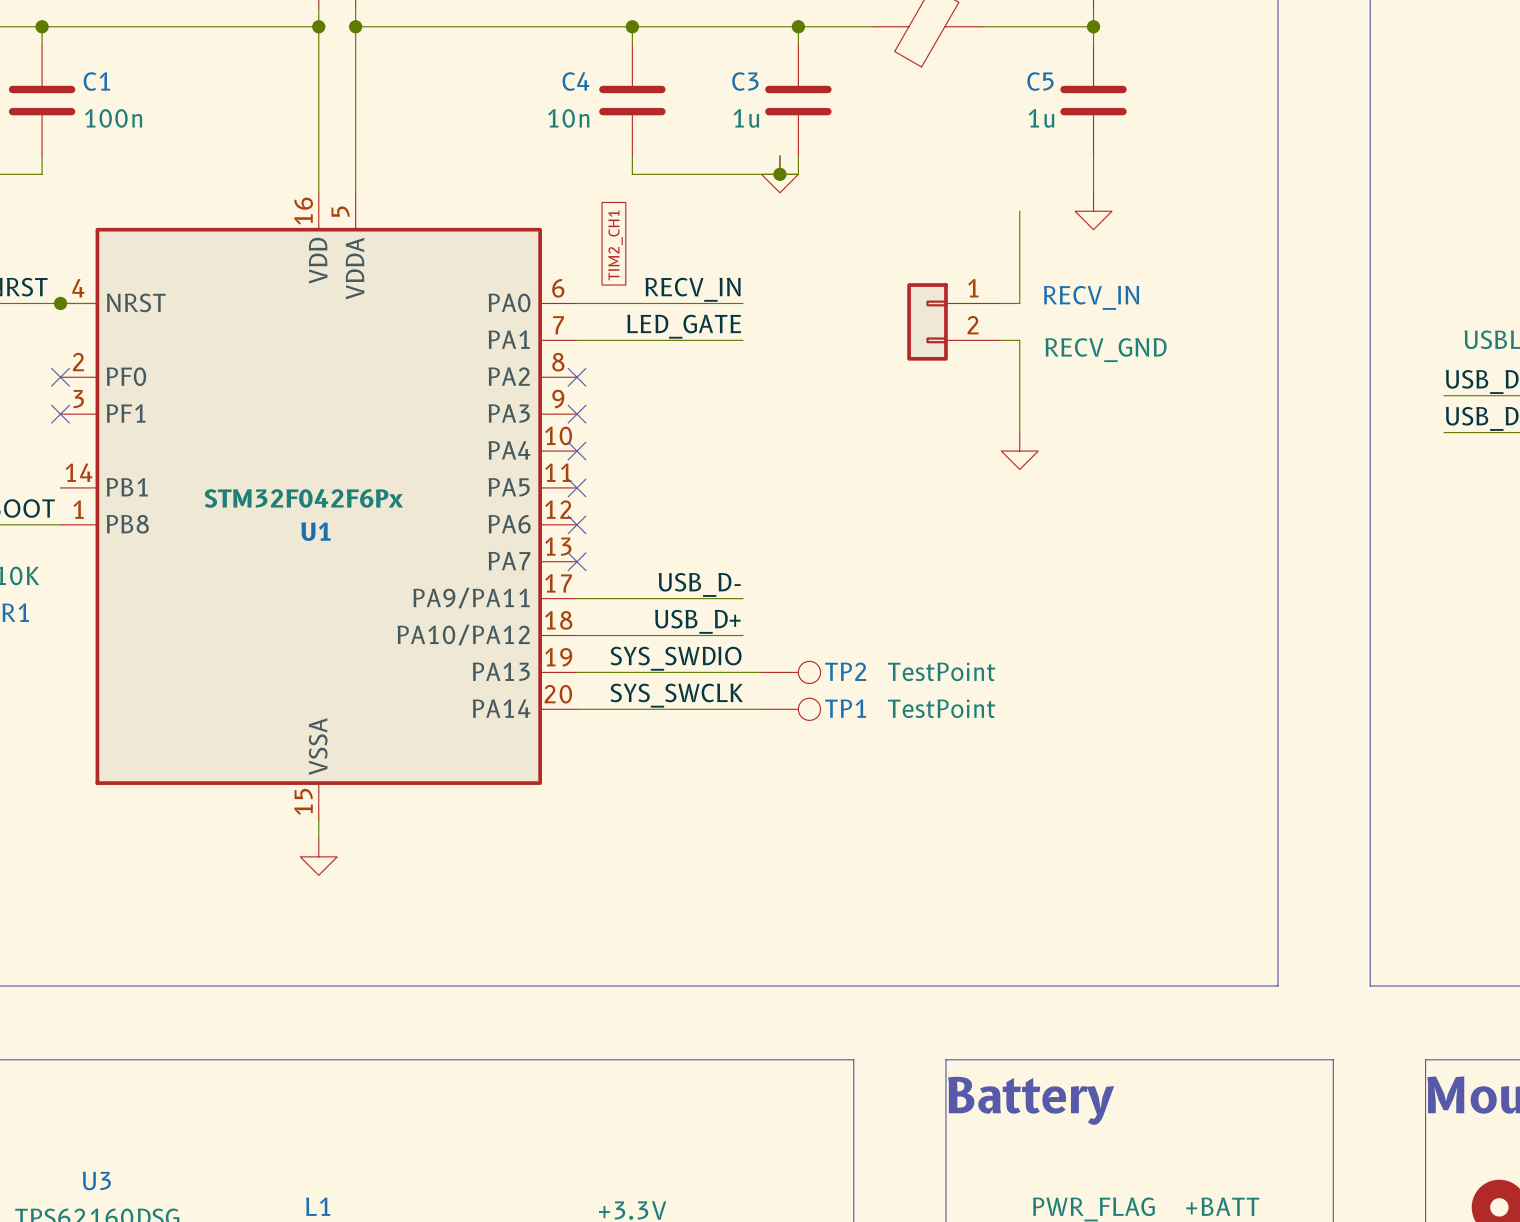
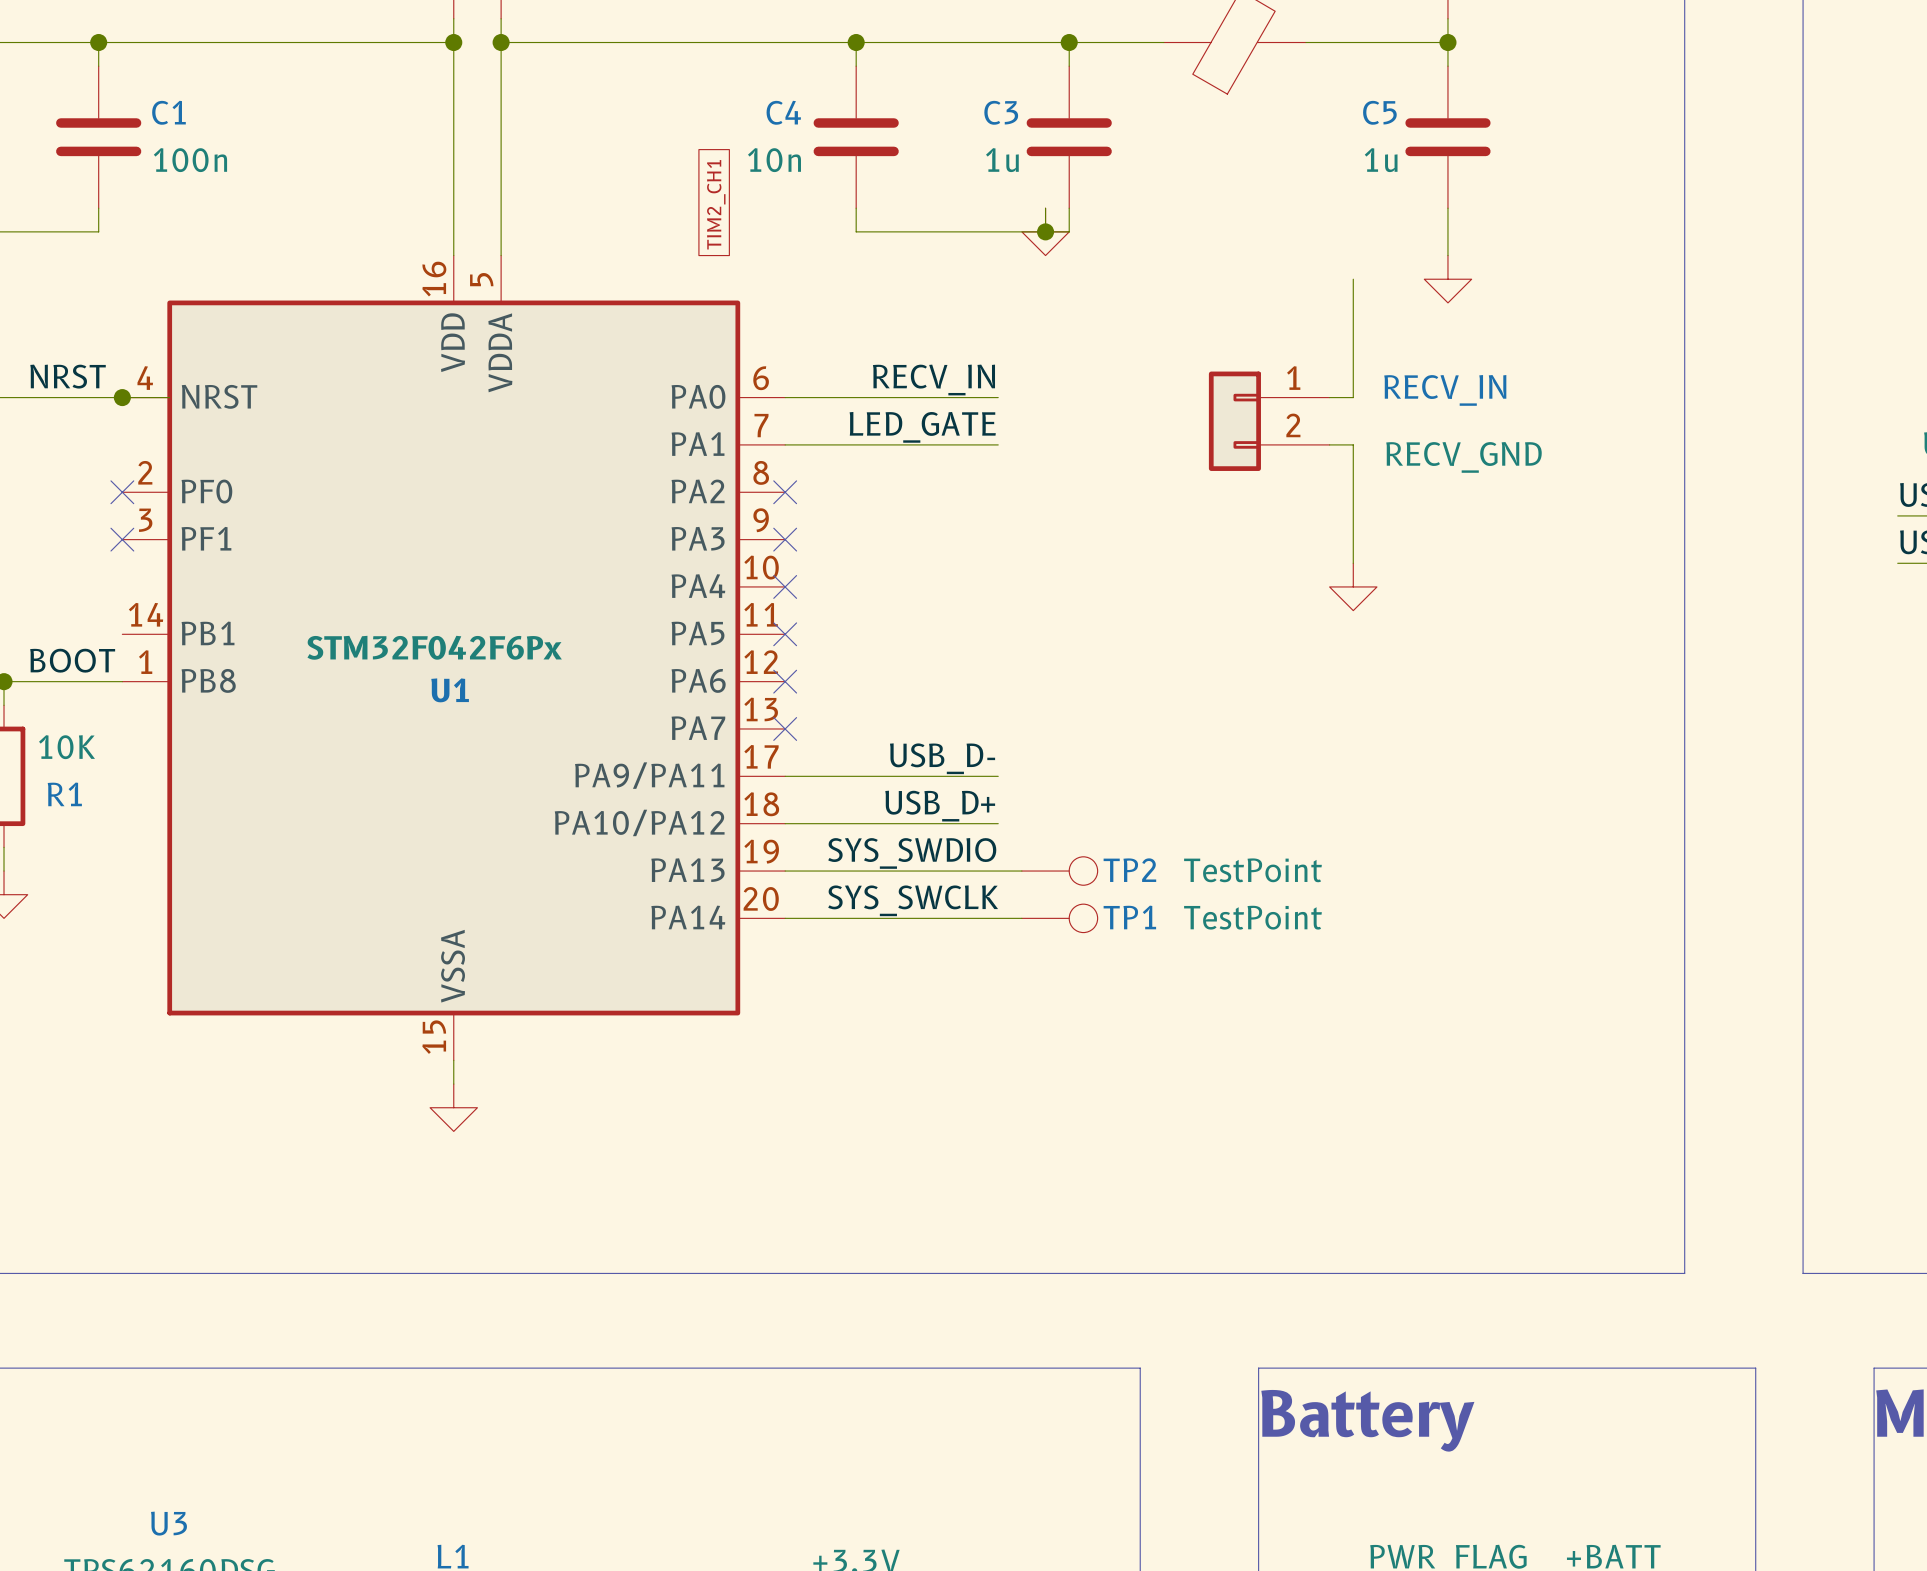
global label position: TIM2_CH1 (615, 245) -> TIM2_CH1 (716, 204)

